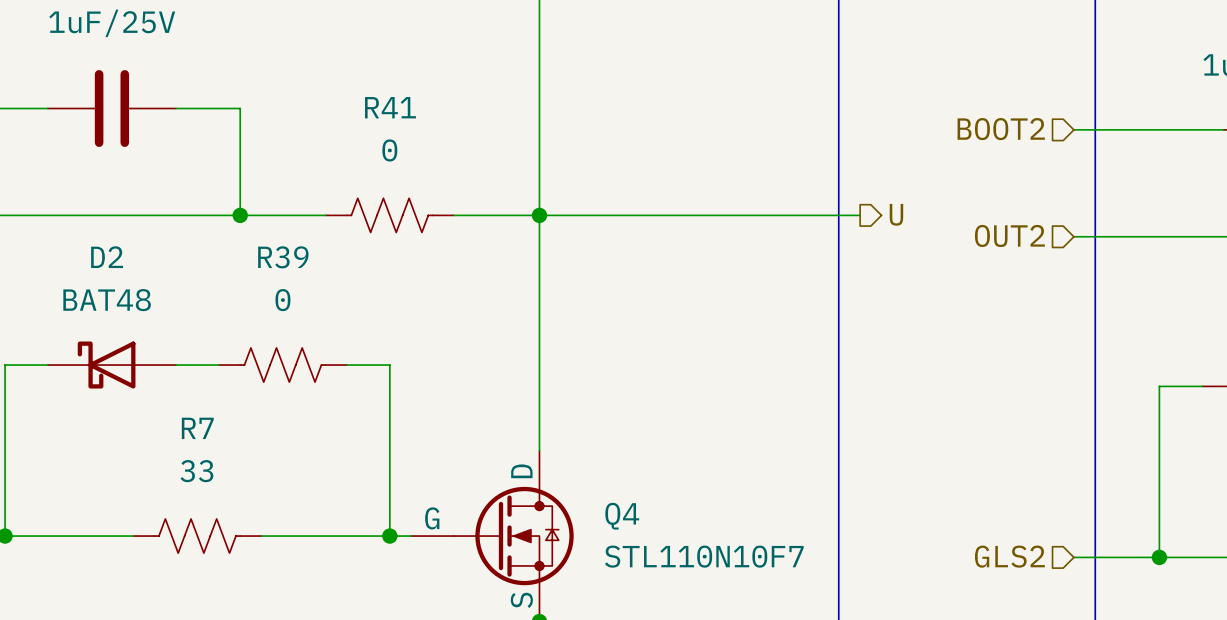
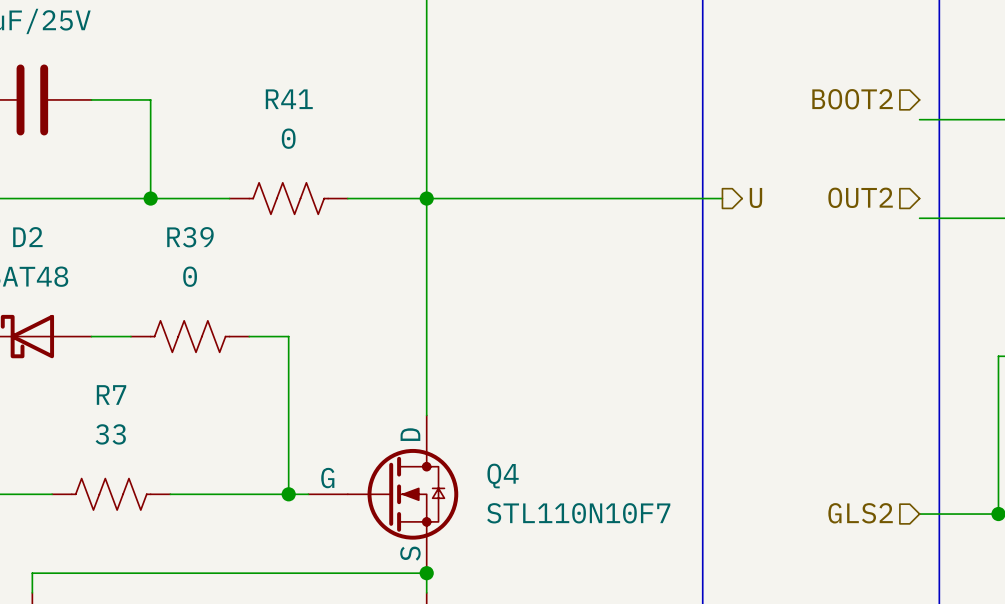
hierarchical label position: BOOT2 (1001, 129) -> BOOT2 (852, 99)
hierarchical label position: OUT2 (1009, 235) -> OUT2 (860, 197)

